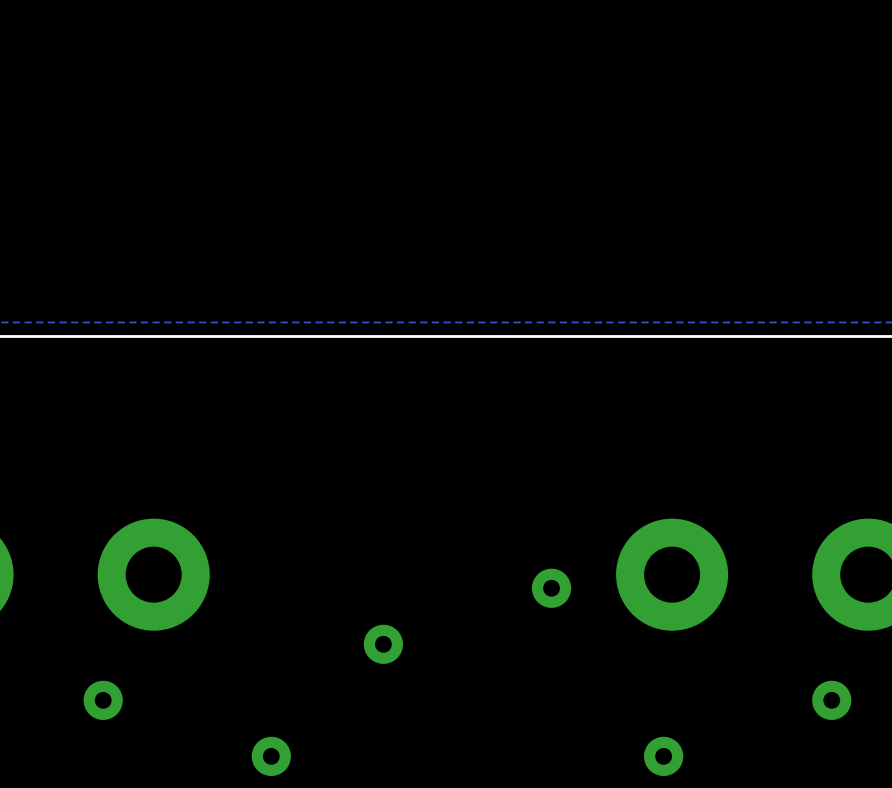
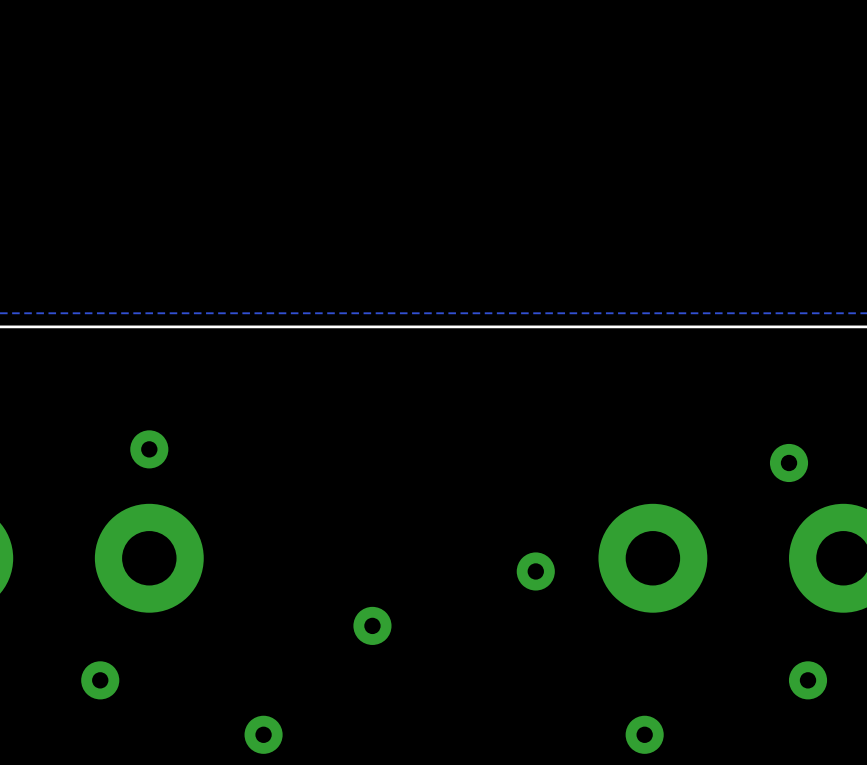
via: none -> (149, 449)
via: none -> (789, 462)

